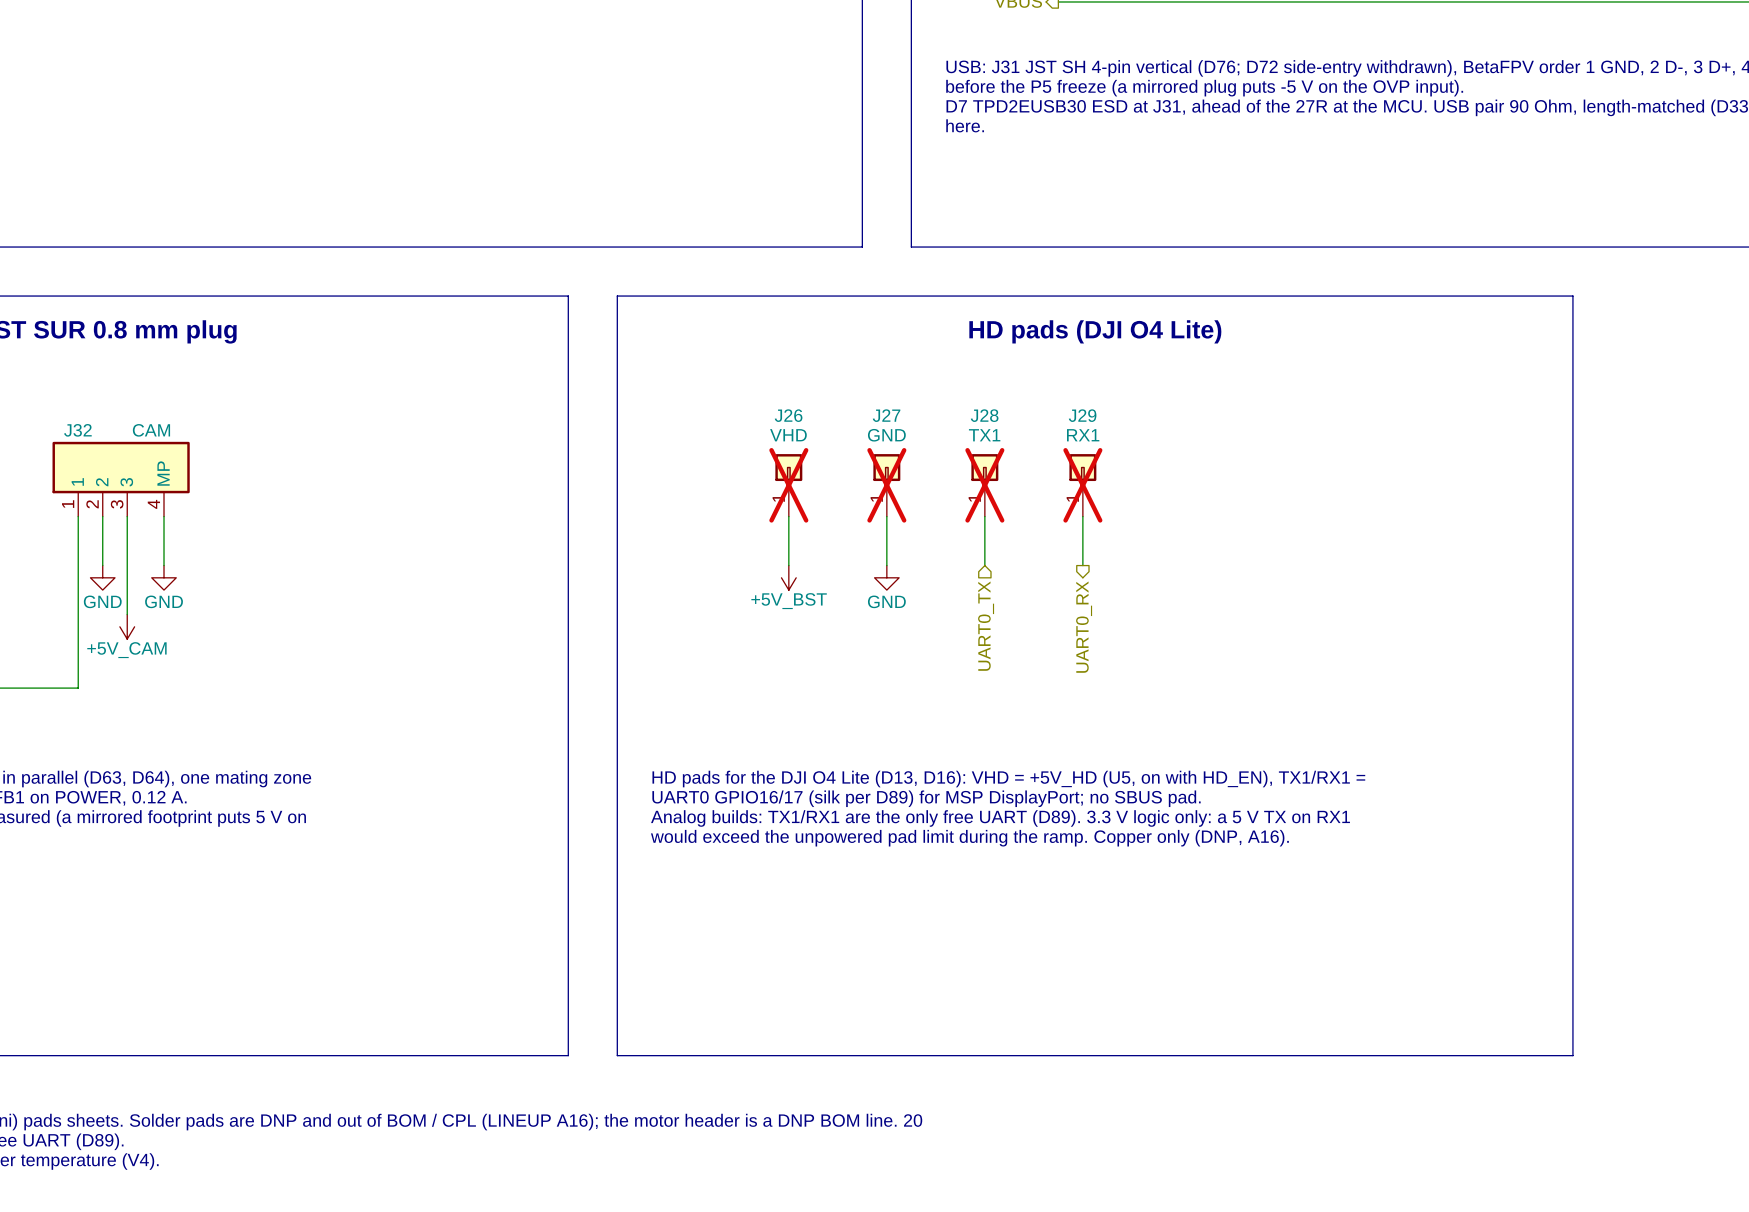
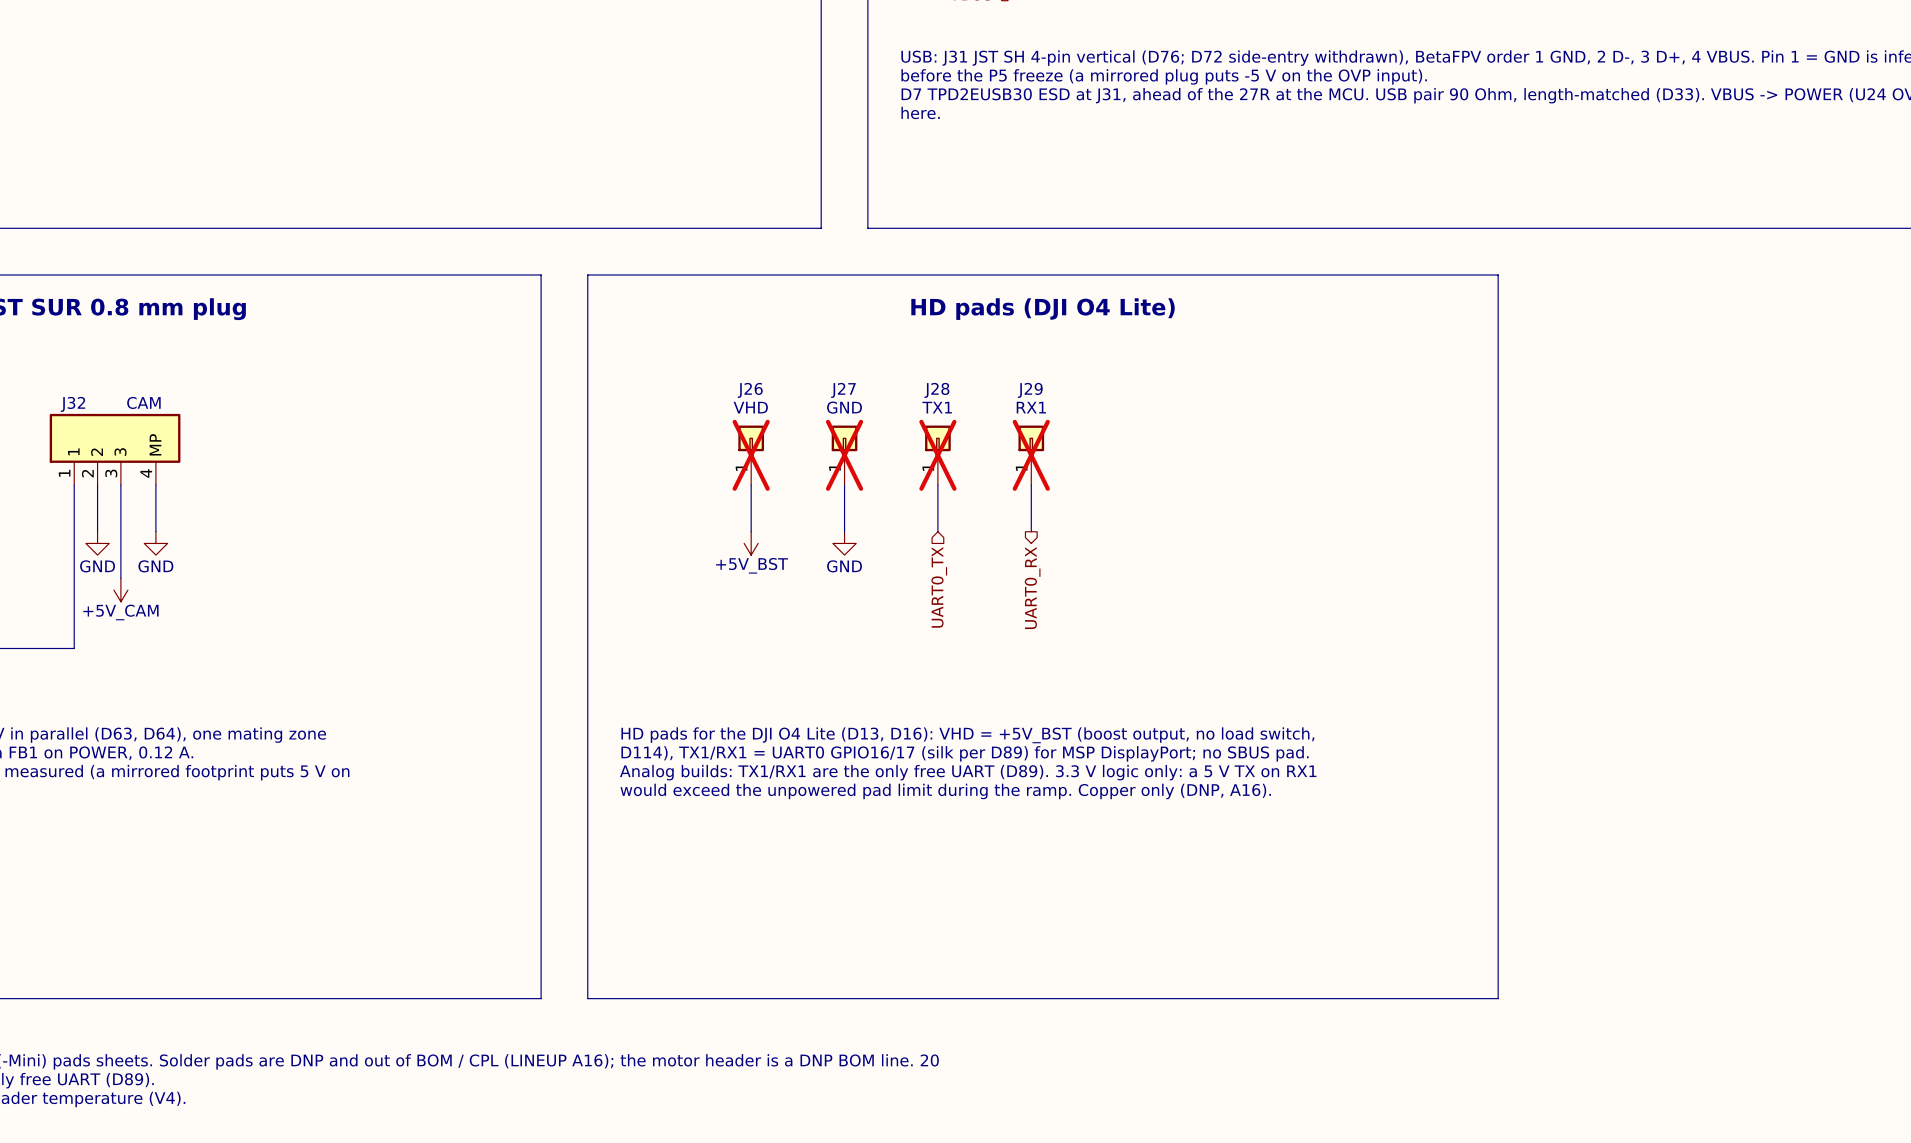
text: HD pads for the DJI O4 Lite (D13, D16): VHD = +5V_HD (U5, on with HD_EN), TX1/RX1 = (1008, 779) -> HD pads for the DJI O4 Lite (D13, D16): VHD = +5V_BST (boost output, no load switch, (967, 735)
text: UART0 GPIO16/17 (silk per D89) for MSP DisplayPort; no SBUS pad. (926, 798) -> D114), TX1/RX1 = UART0 GPIO16/17 (silk per D89) for MSP DisplayPort; no SBUS pad. (965, 753)

